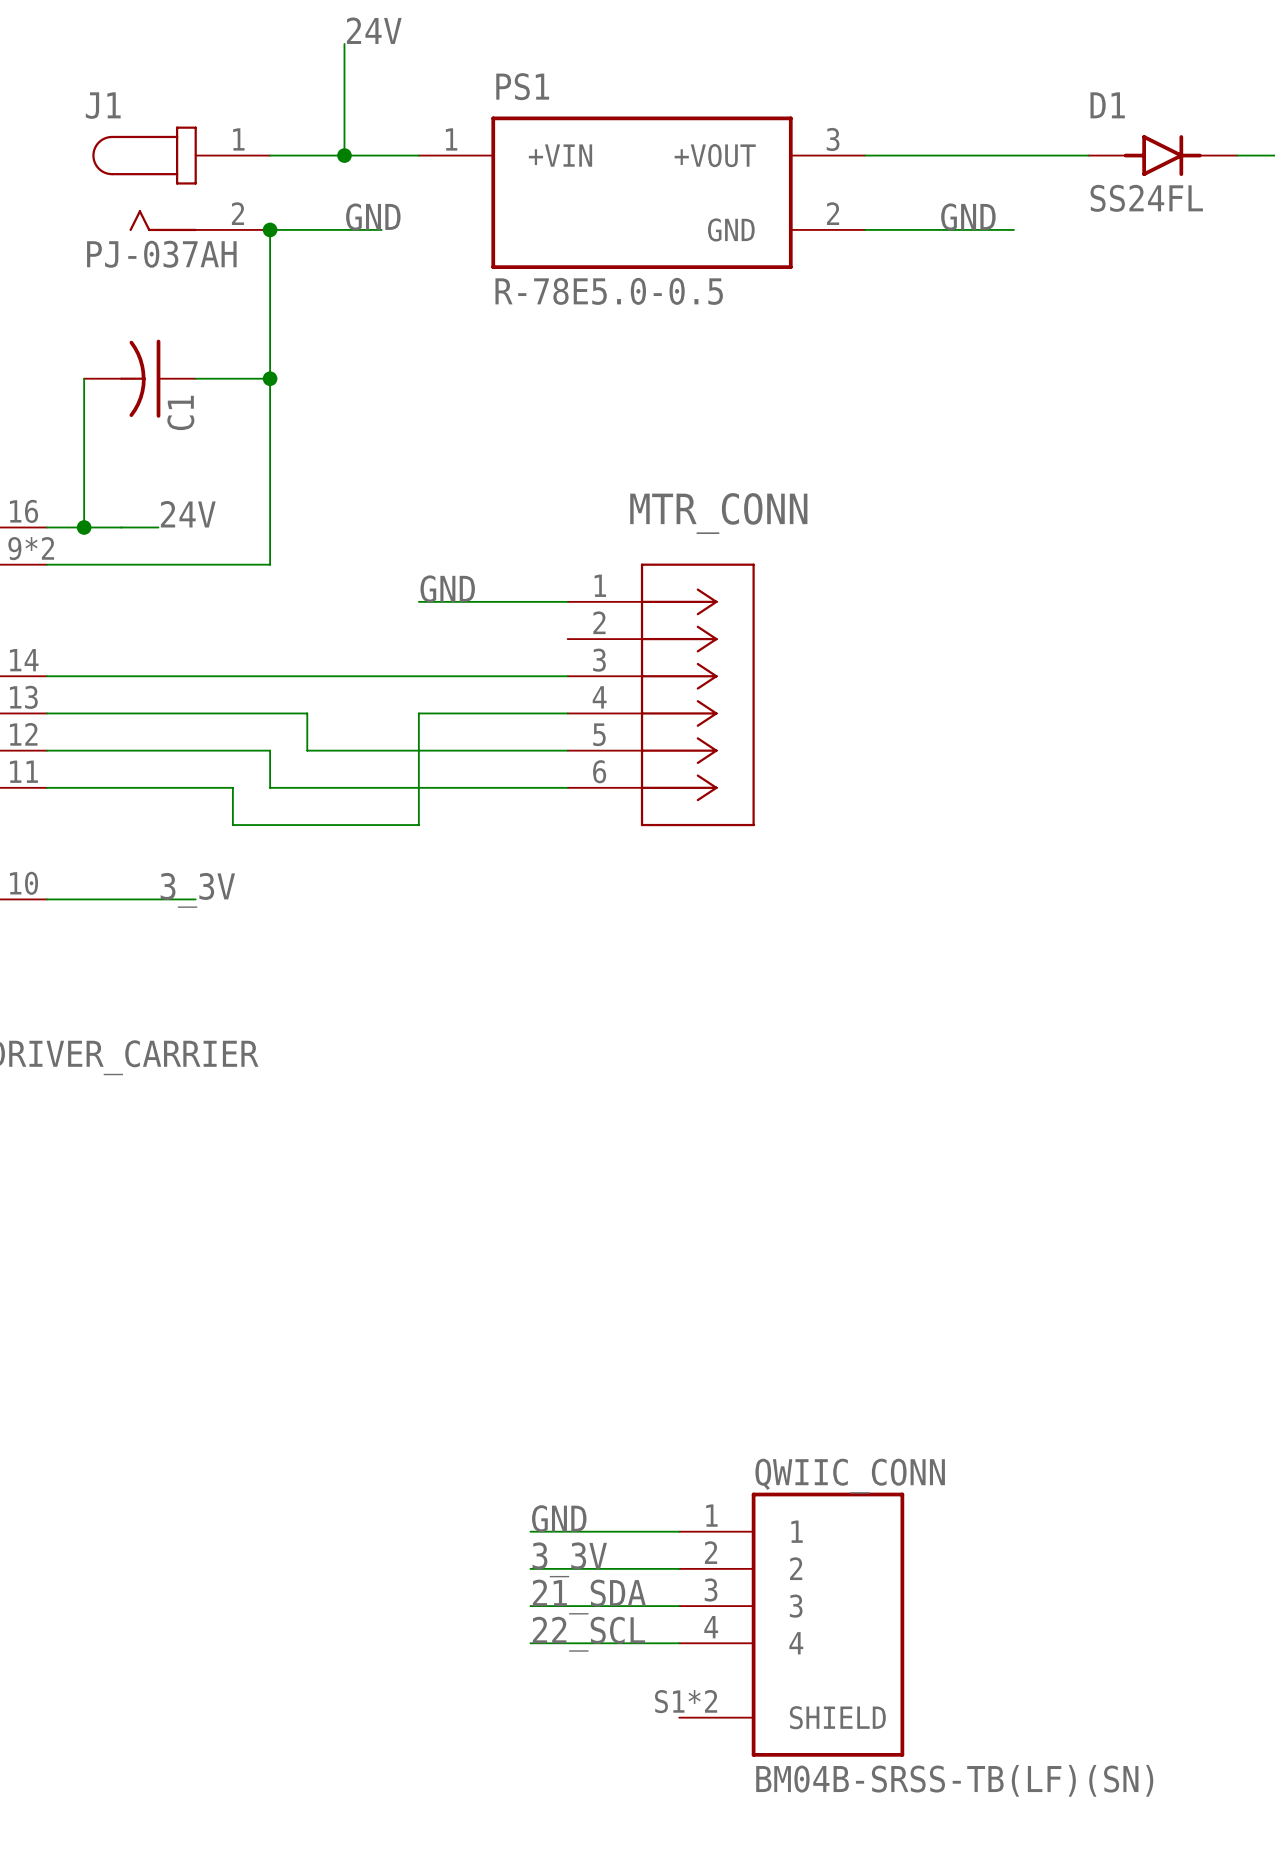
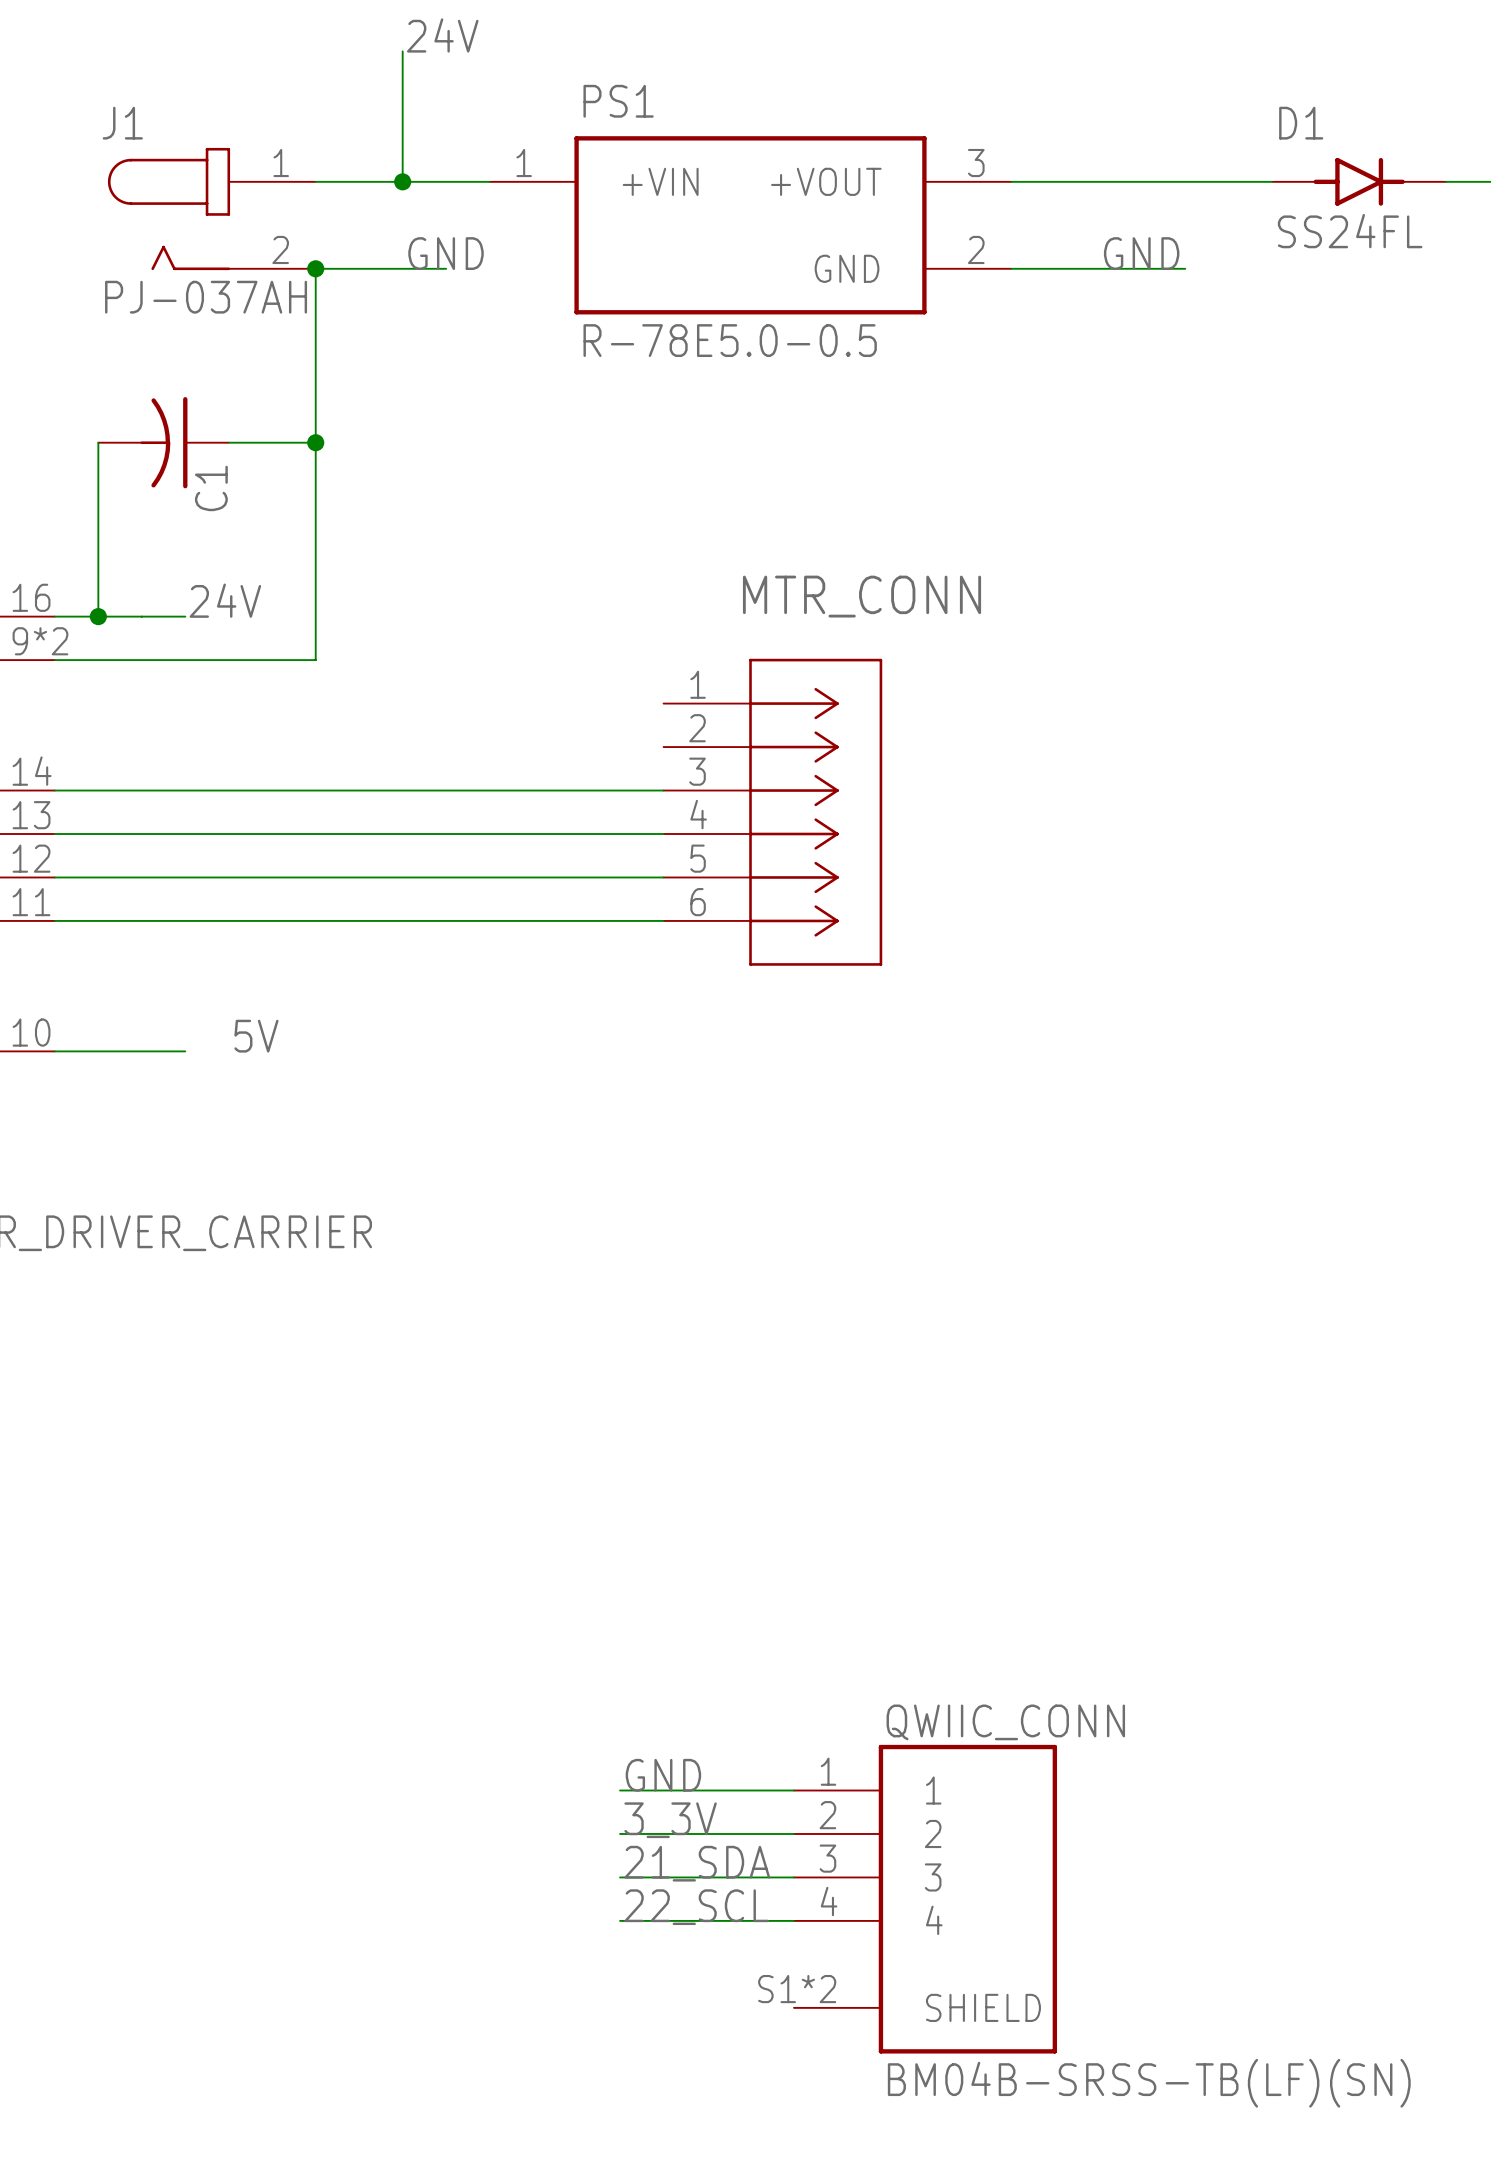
label: GND (447, 588) -> none
wire: (418, 601) (567, 601) -> none
wire: (307, 713) (307, 750) -> (315, 877) (359, 877)
wire: (418, 713) (418, 825) (232, 825) (232, 787) -> (489, 834) (359, 834)
wire: (270, 750) (270, 787) -> (272, 920) (315, 920)
label: none -> 5V (256, 1036)
label: 3_3V (197, 890) -> none
wire: (158, 899) (195, 899) -> none

